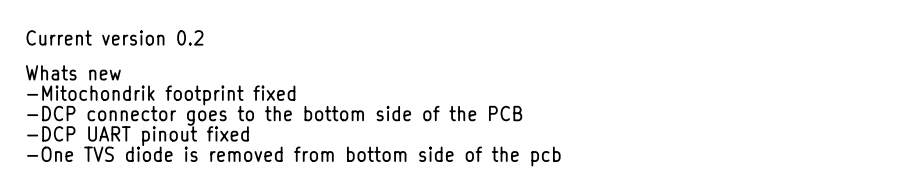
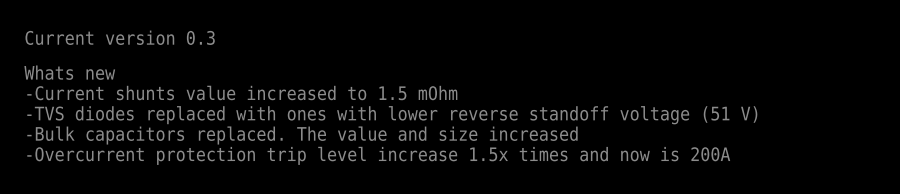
text: Current version 0.2 (114, 37) -> Current version 0.3 (120, 37)
text: -Mitochondrik footprint fixed (161, 95) -> -Current shunts value increased to 1.5 mOhm (242, 92)
text: -DCP connector goes to the bottom side of the PCB (274, 115) -> -TVS diodes replaced with ones with lower reverse standoff voltage (51 V) (392, 115)
text: -DCP UART pinout fixed (137, 136) -> -Bulk capacitors replaced. The value and size increased (302, 135)
text: -One TVS diode is removed from bottom side of the pcb (293, 156) -> -Overcurrent protection trip level increase 1.5x times and now is 200A (378, 155)

